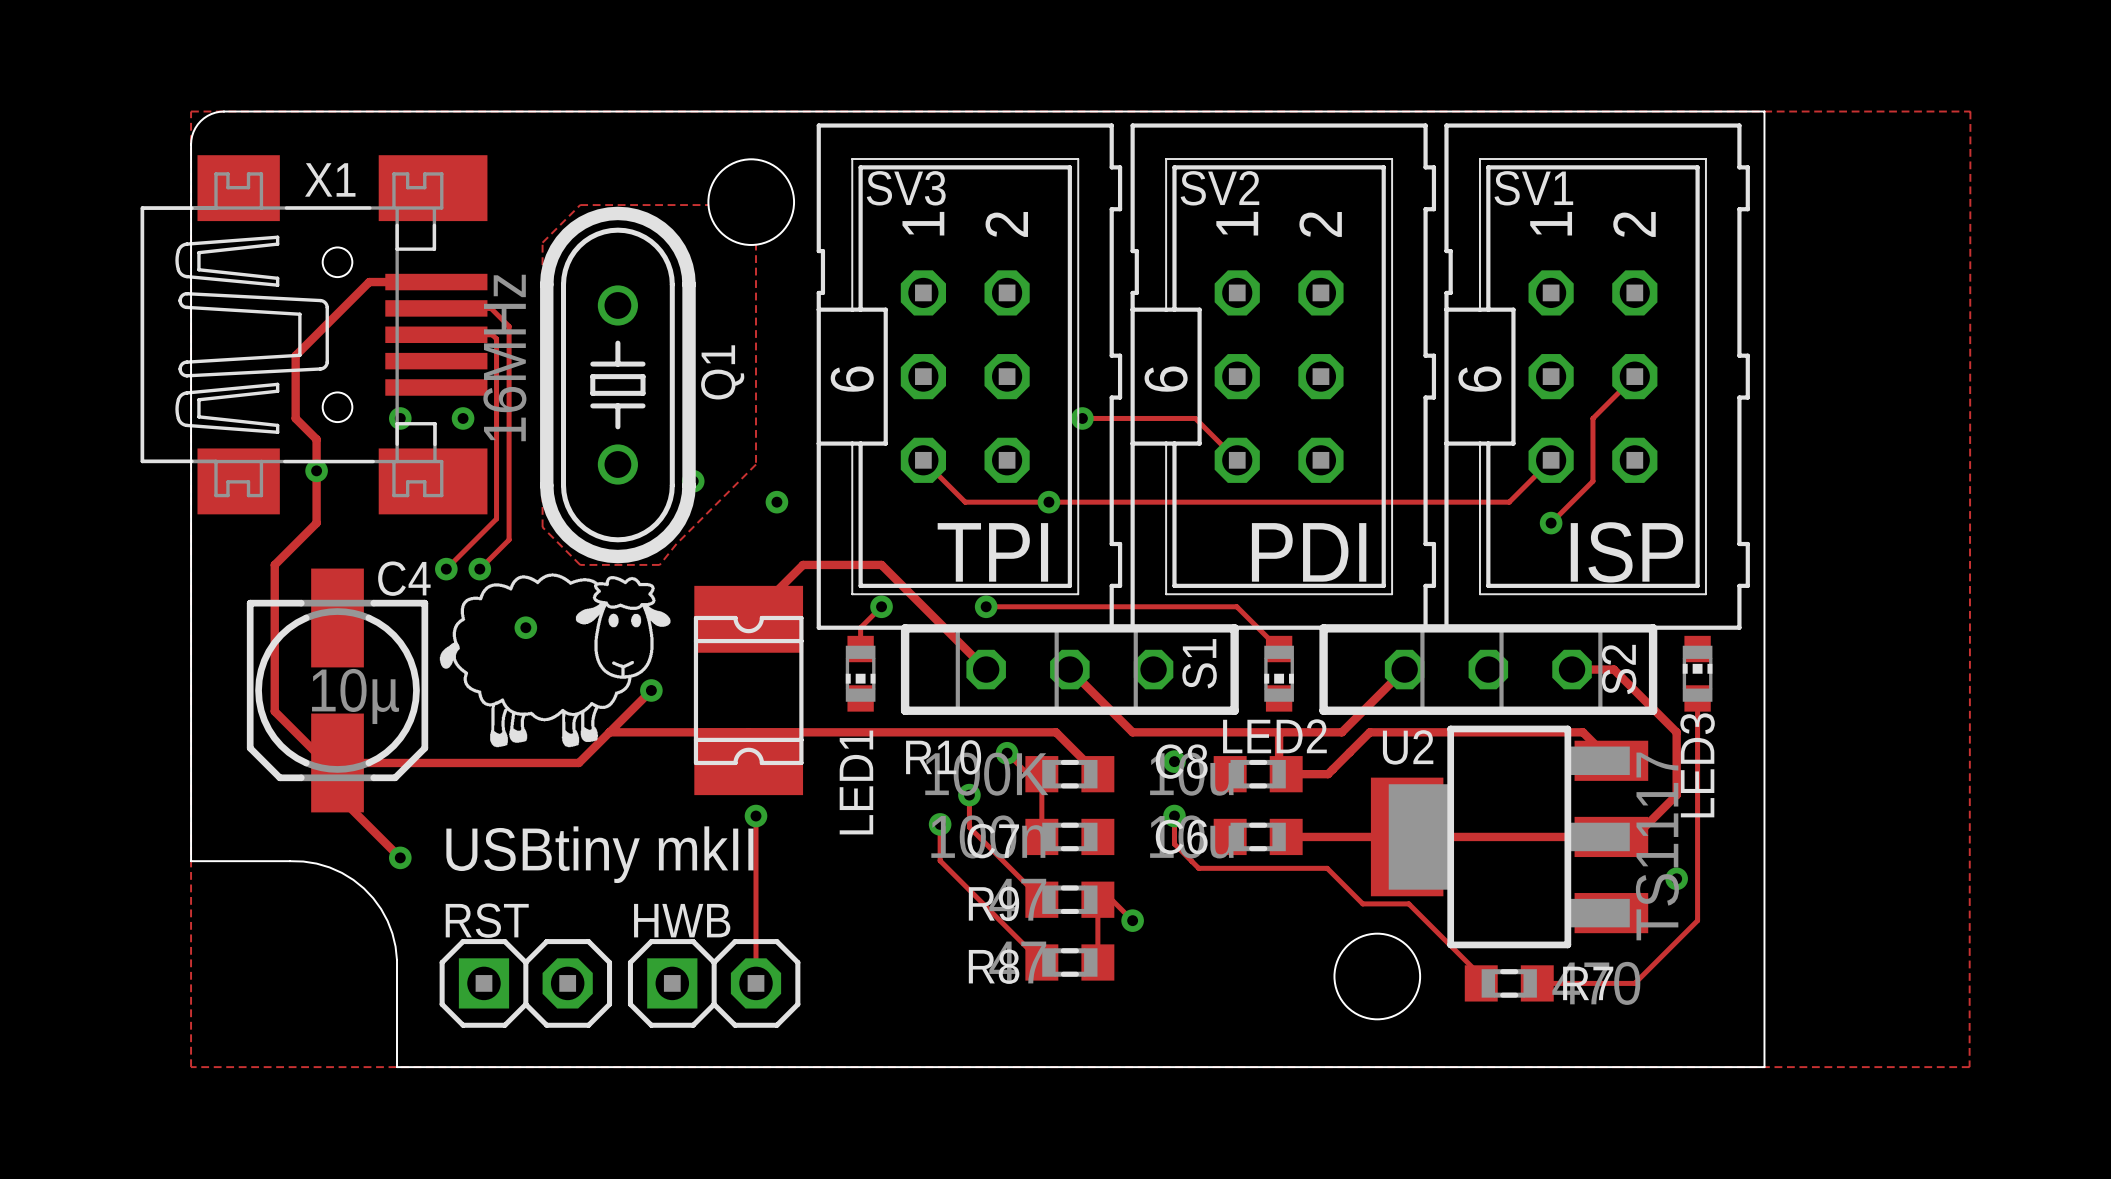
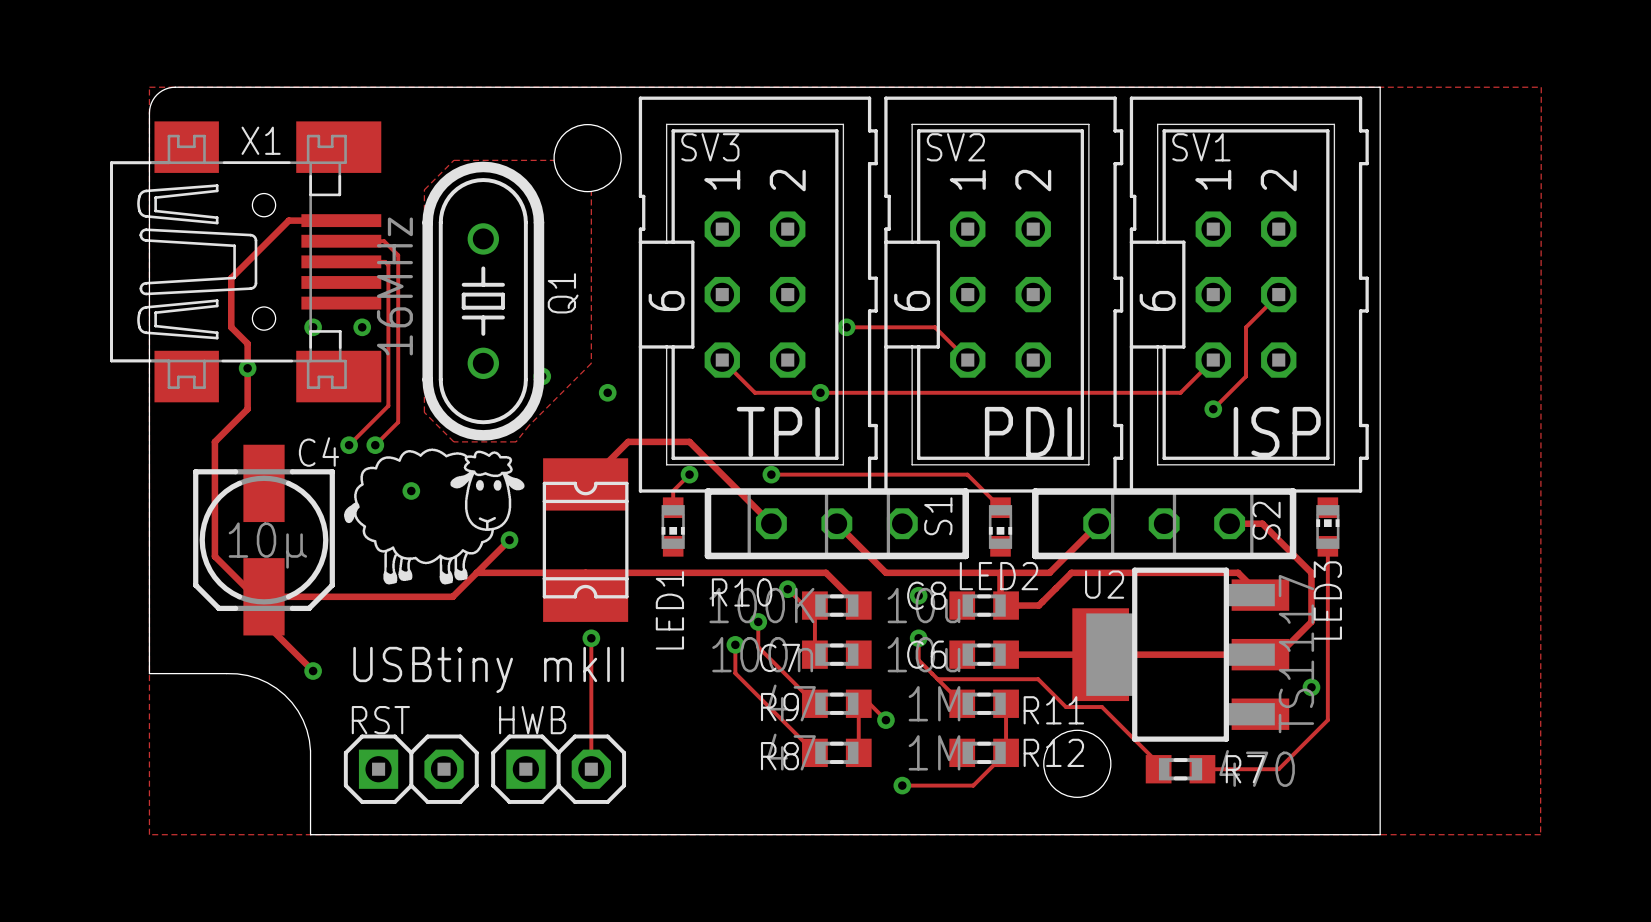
track: none -> (937, 679) (962, 703)
R11: none -> 1M (984, 703)
track: none -> (1006, 703) (1006, 752) (973, 785) (902, 785)
R12: none -> 1M (984, 752)
via: none -> (902, 785)

